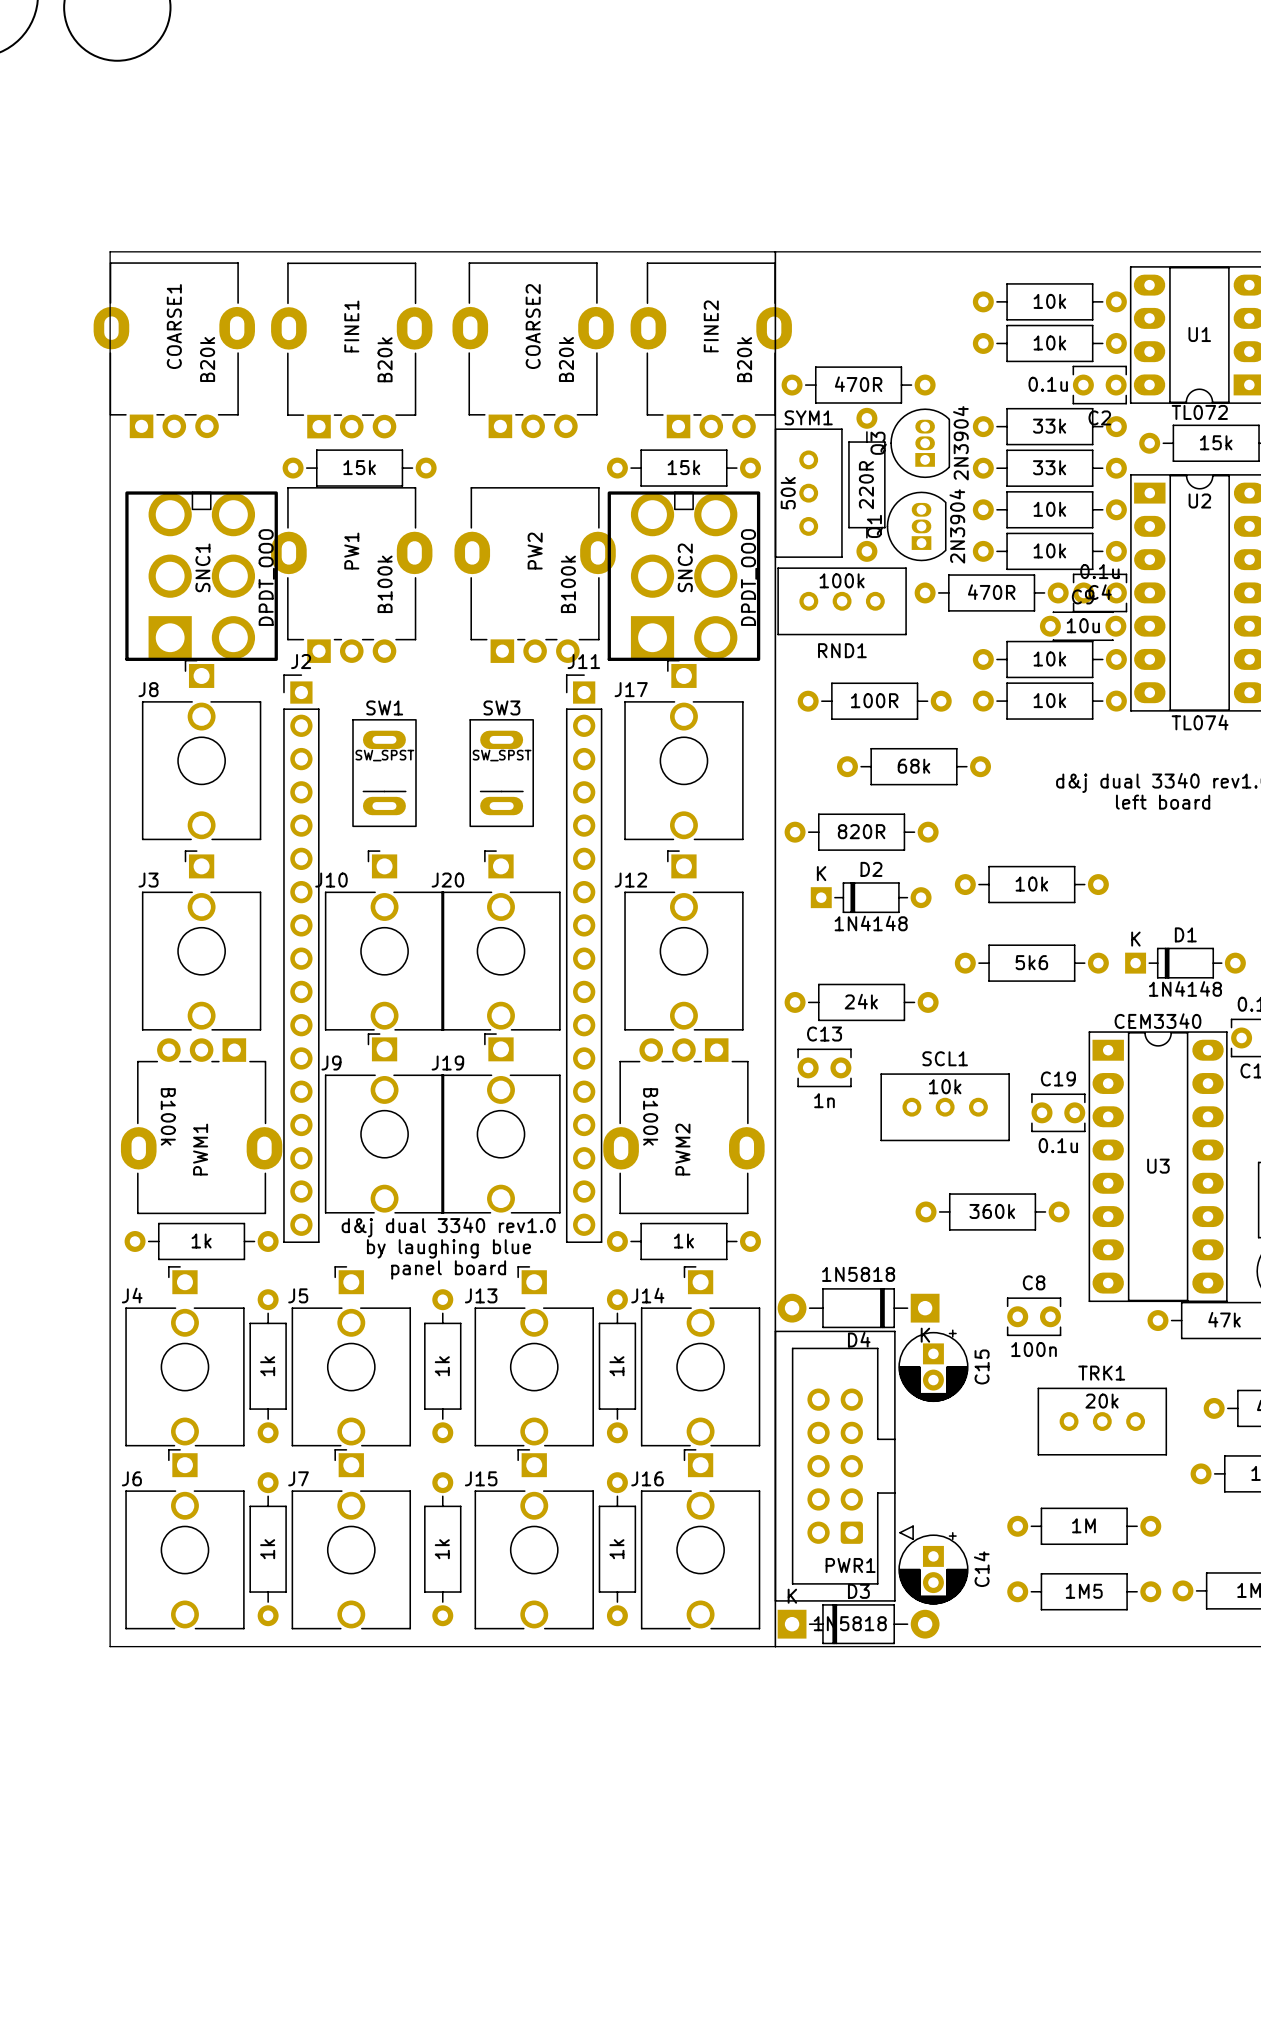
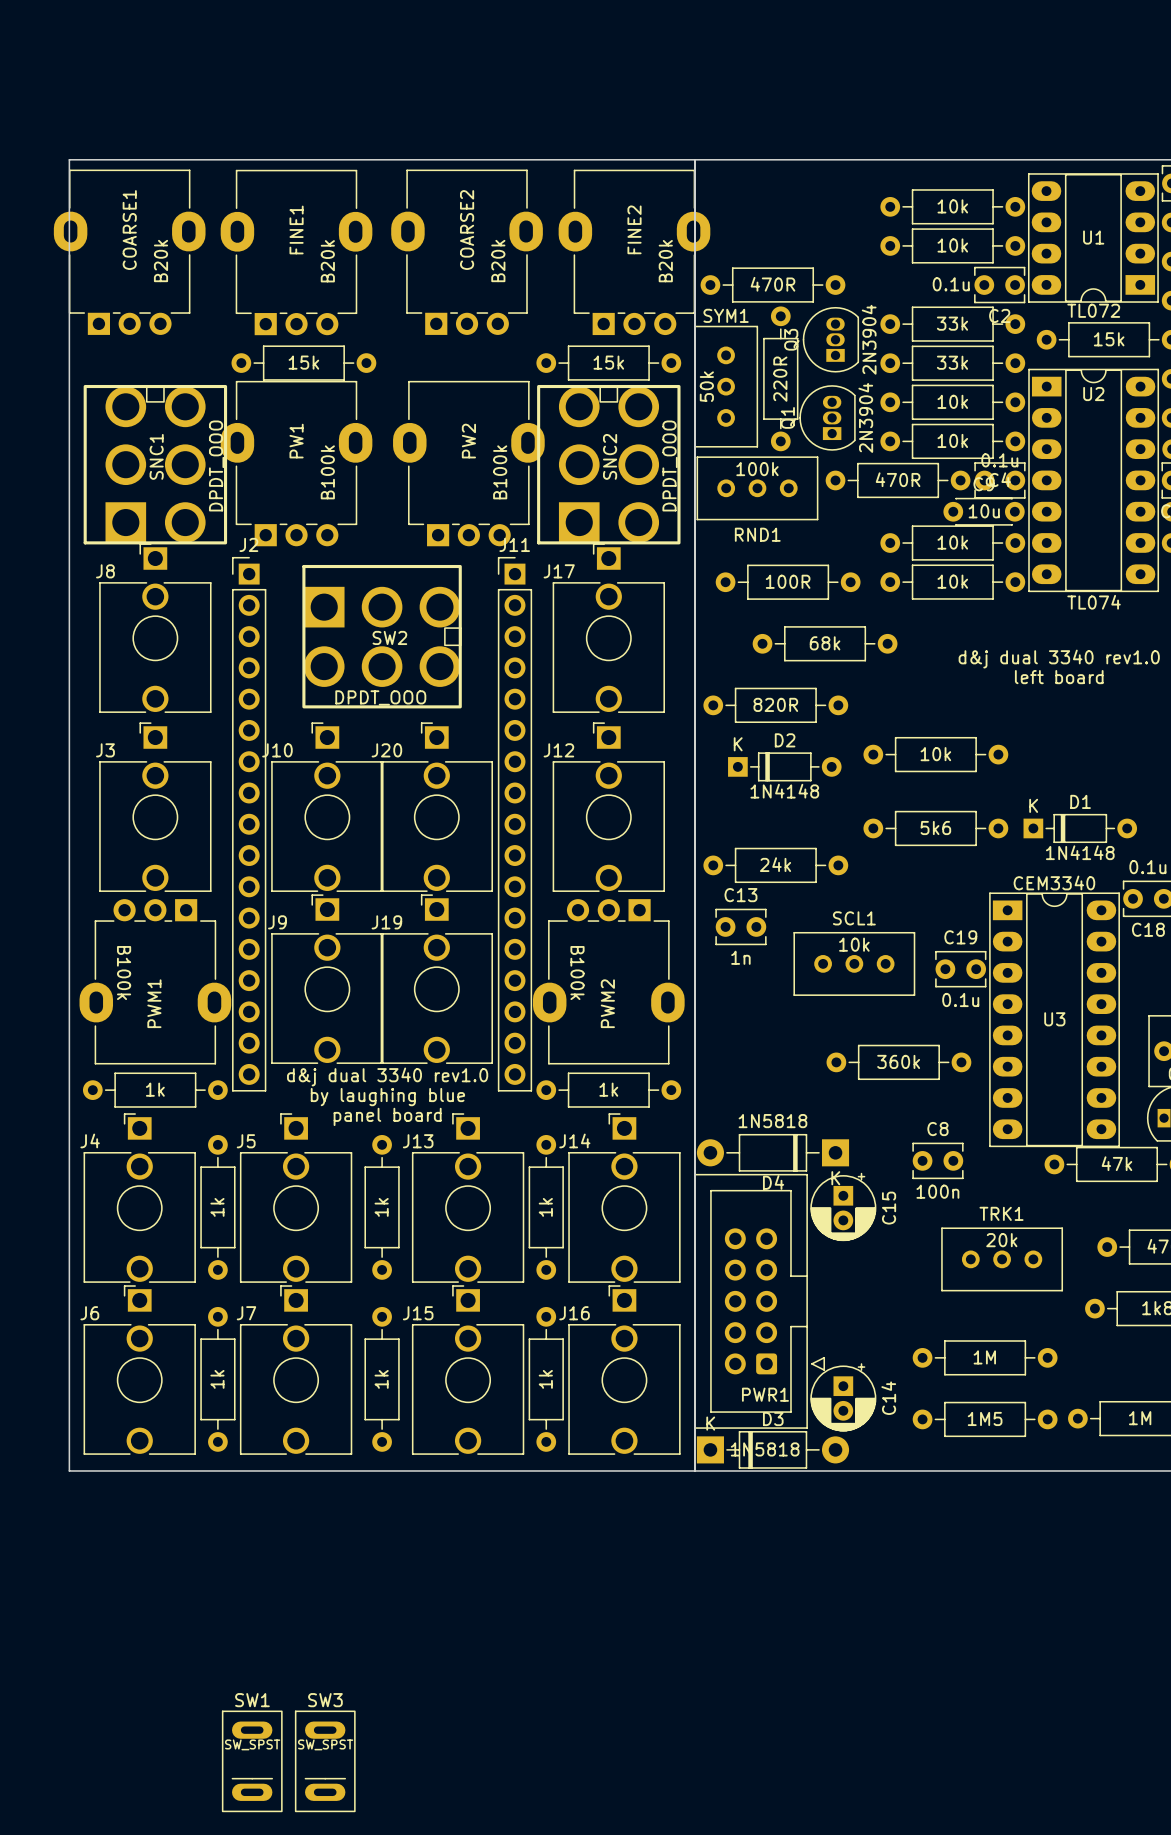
SW2: none -> DPDT_OOO (382, 636)
SW1 position: (384, 773) -> (252, 1761)
SW3 position: (501, 773) -> (325, 1761)

